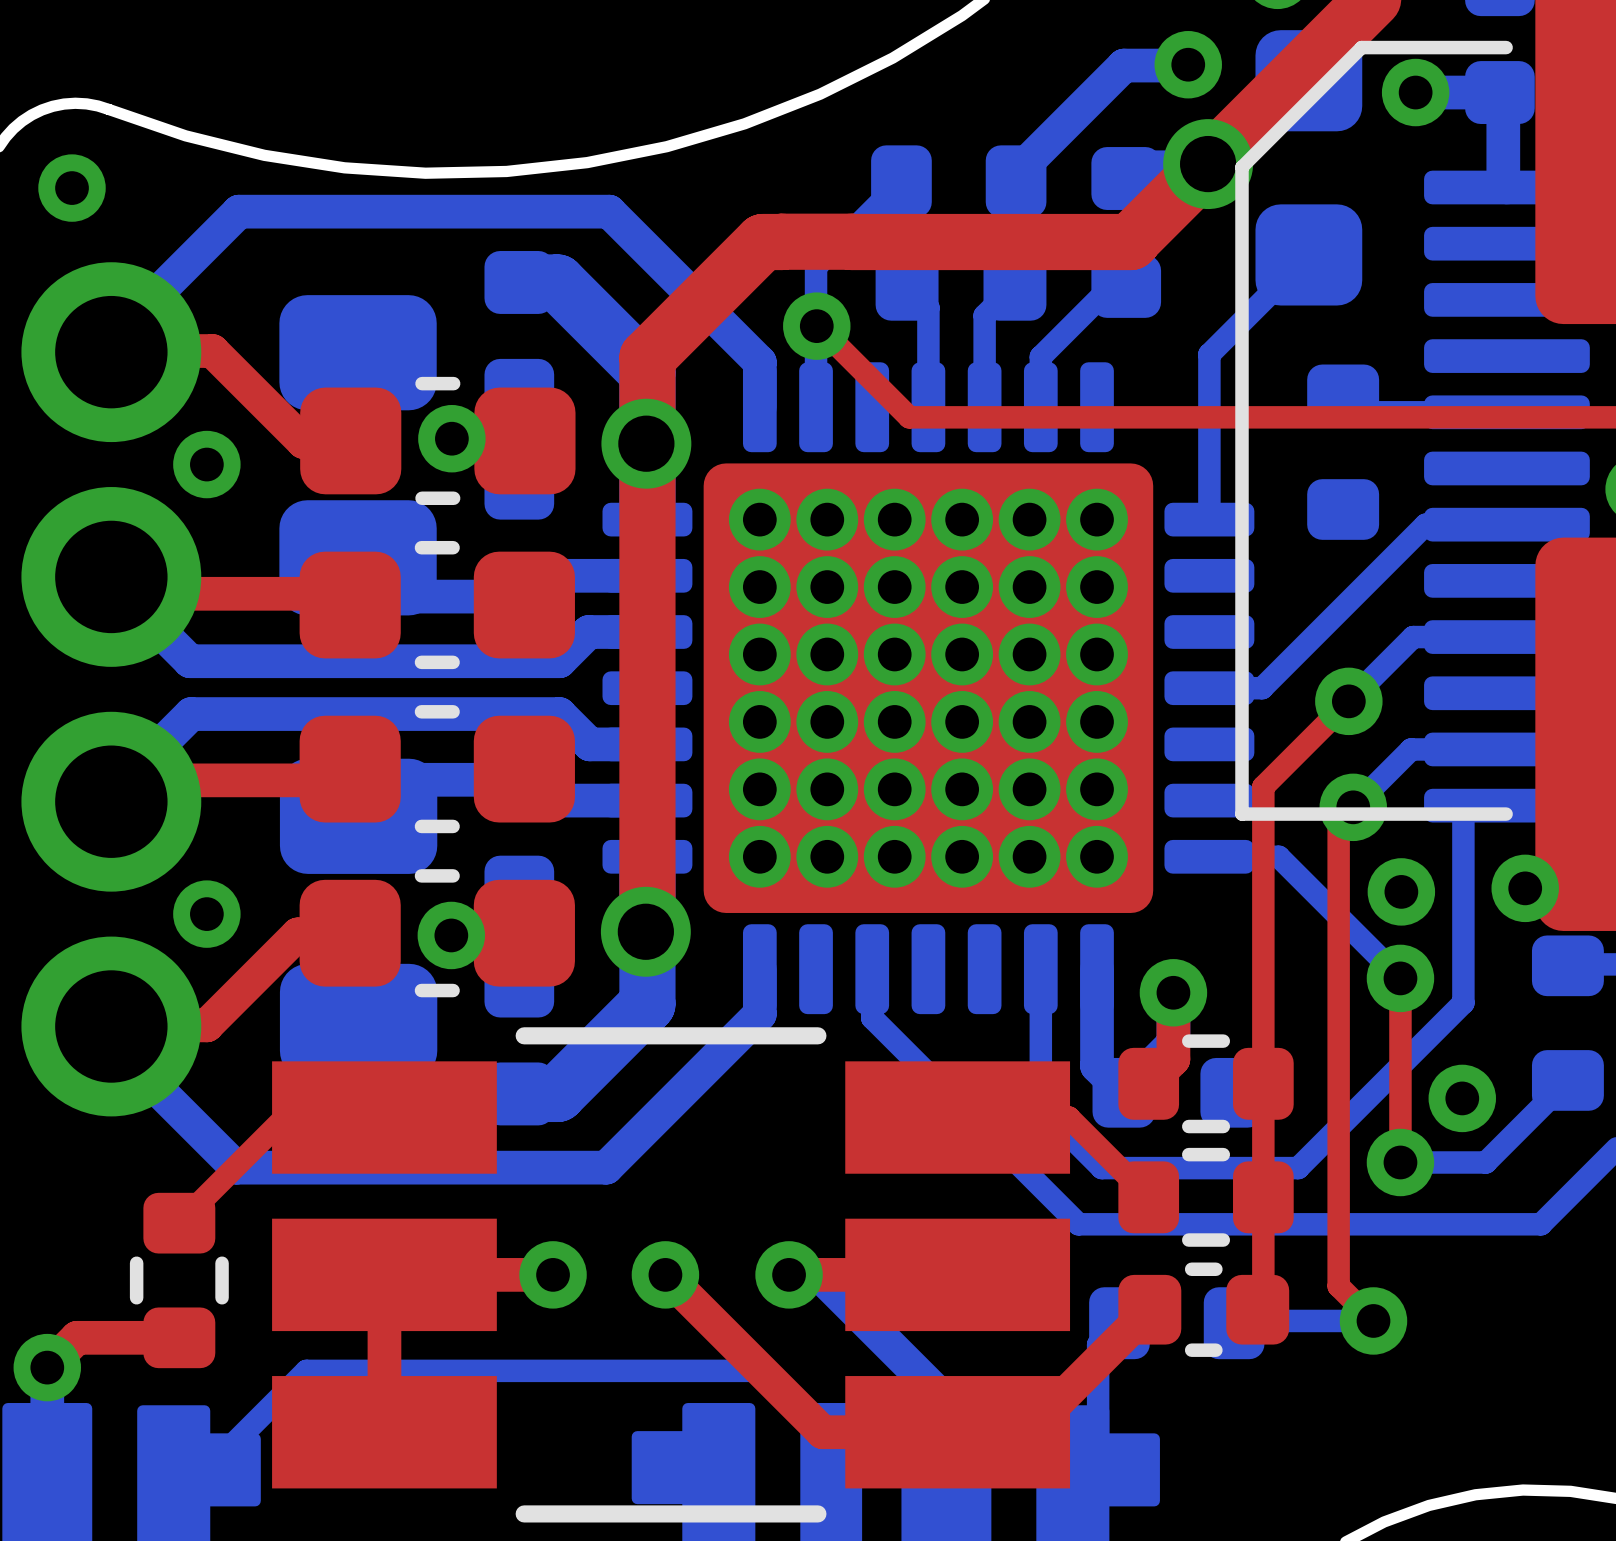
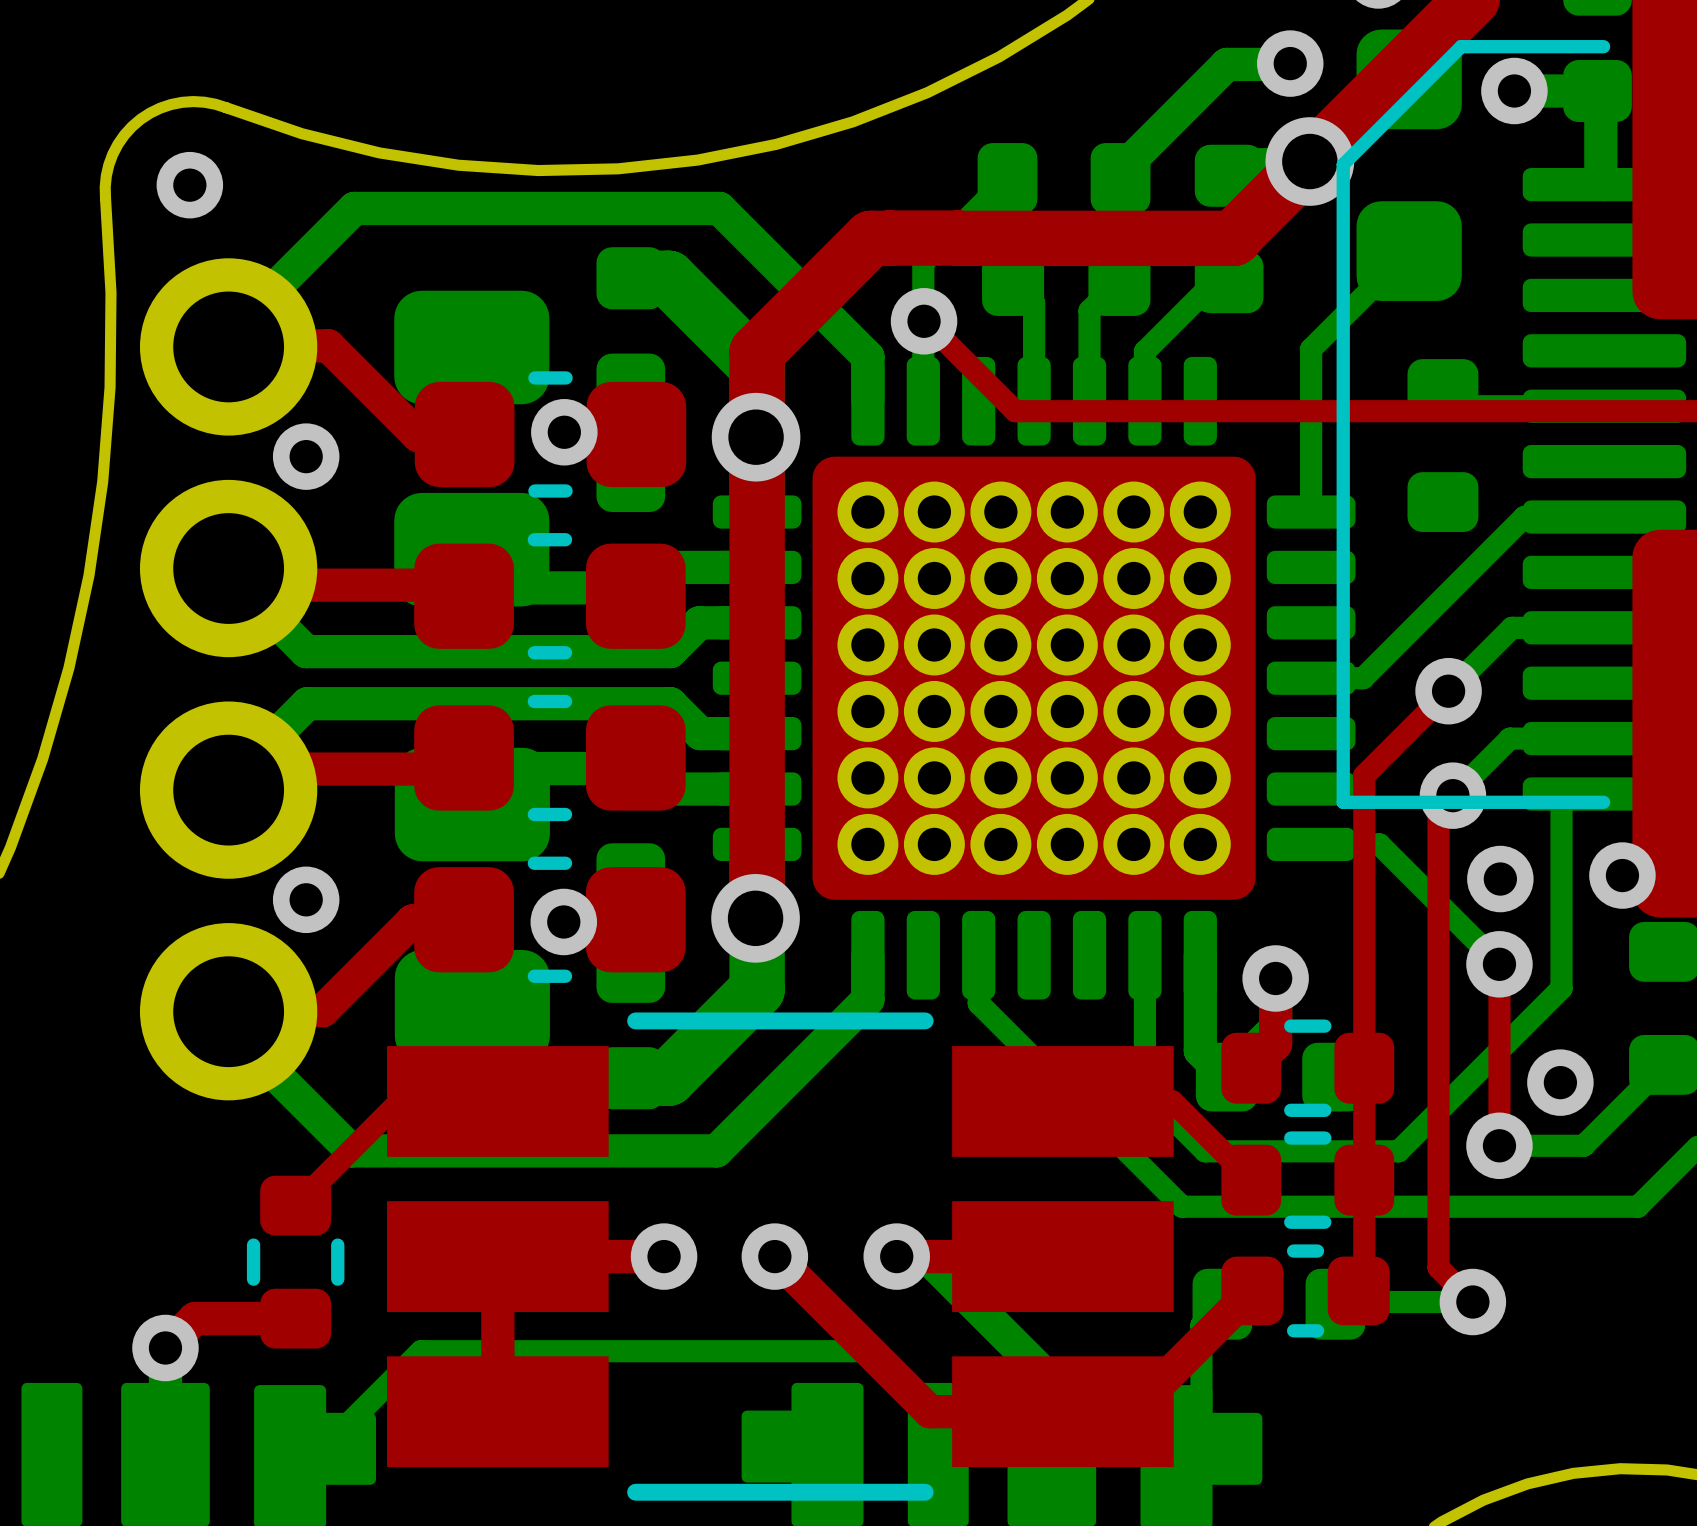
via position: (206, 464) -> (306, 456)
via position: (206, 914) -> (306, 899)

